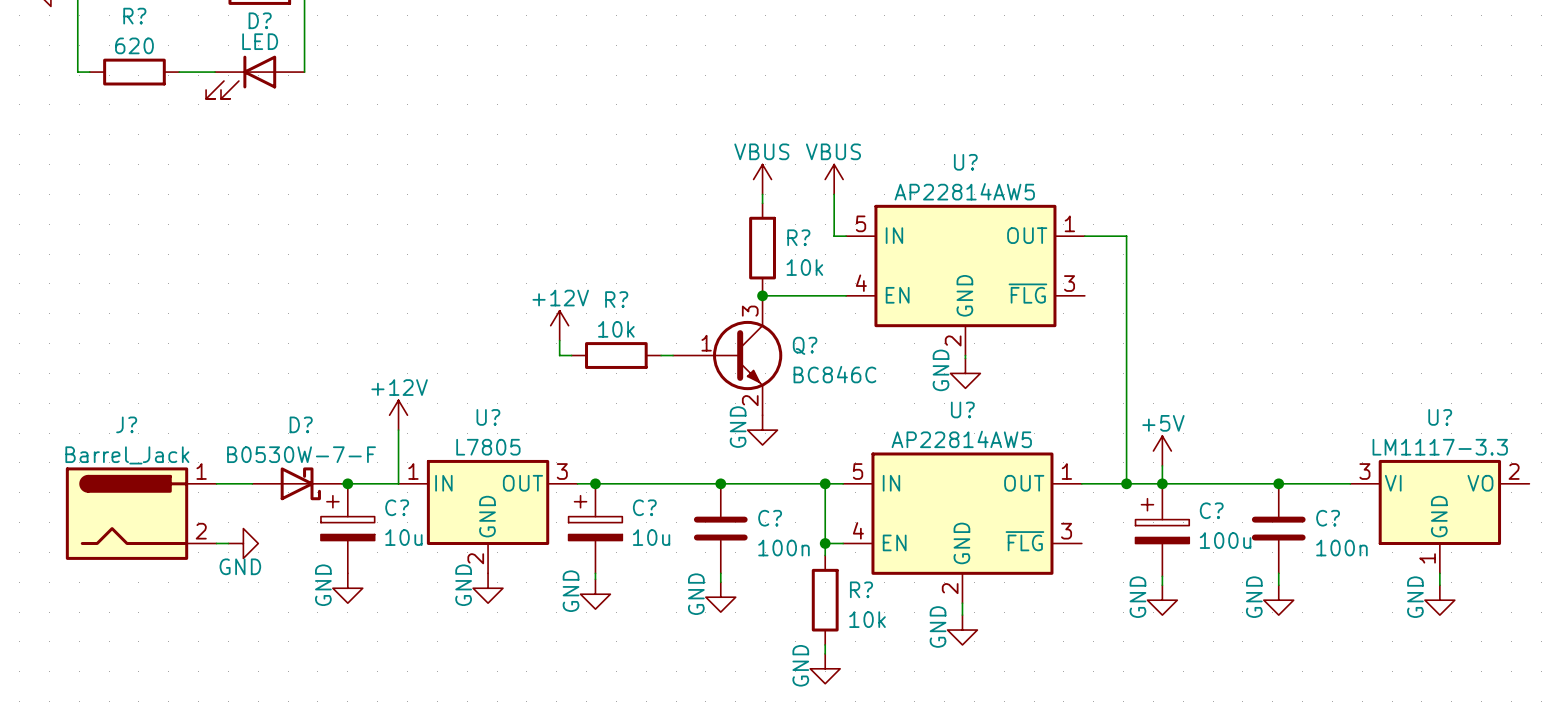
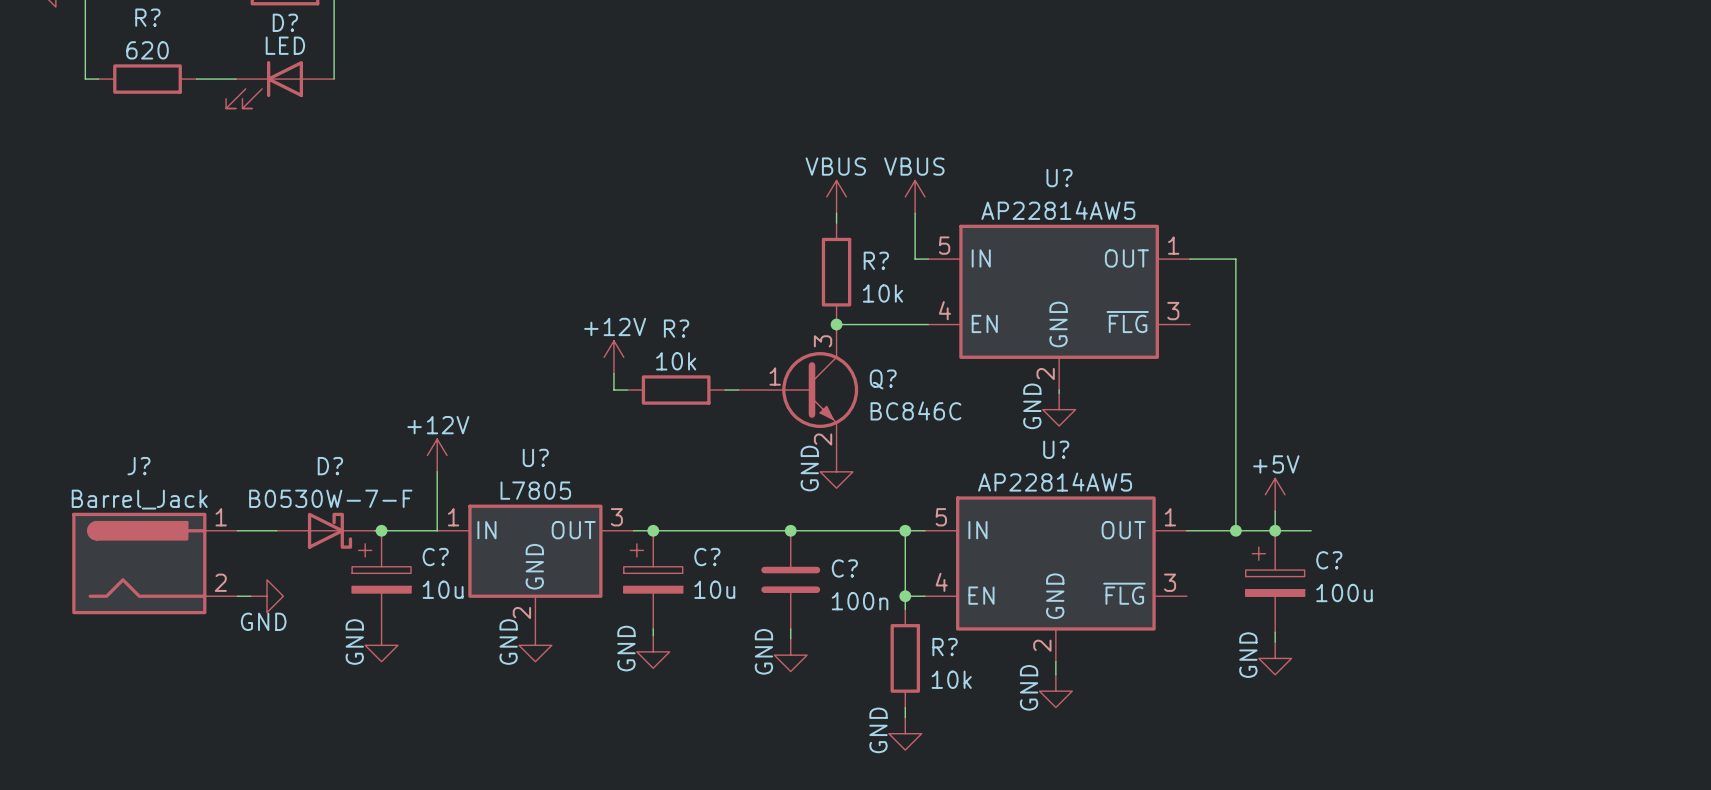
wire: (1195, 483) (1350, 483) -> none
junction: (1278, 483) -> none
U?: LM1117-3.3 (1439, 516) -> none
C?: 100n (1278, 528) -> none
wire: (1278, 573) (1278, 585) -> none
wire: (1439, 573) (1439, 585) -> none
power symbol: GND (1278, 600) -> none
power symbol: GND (1439, 600) -> none

